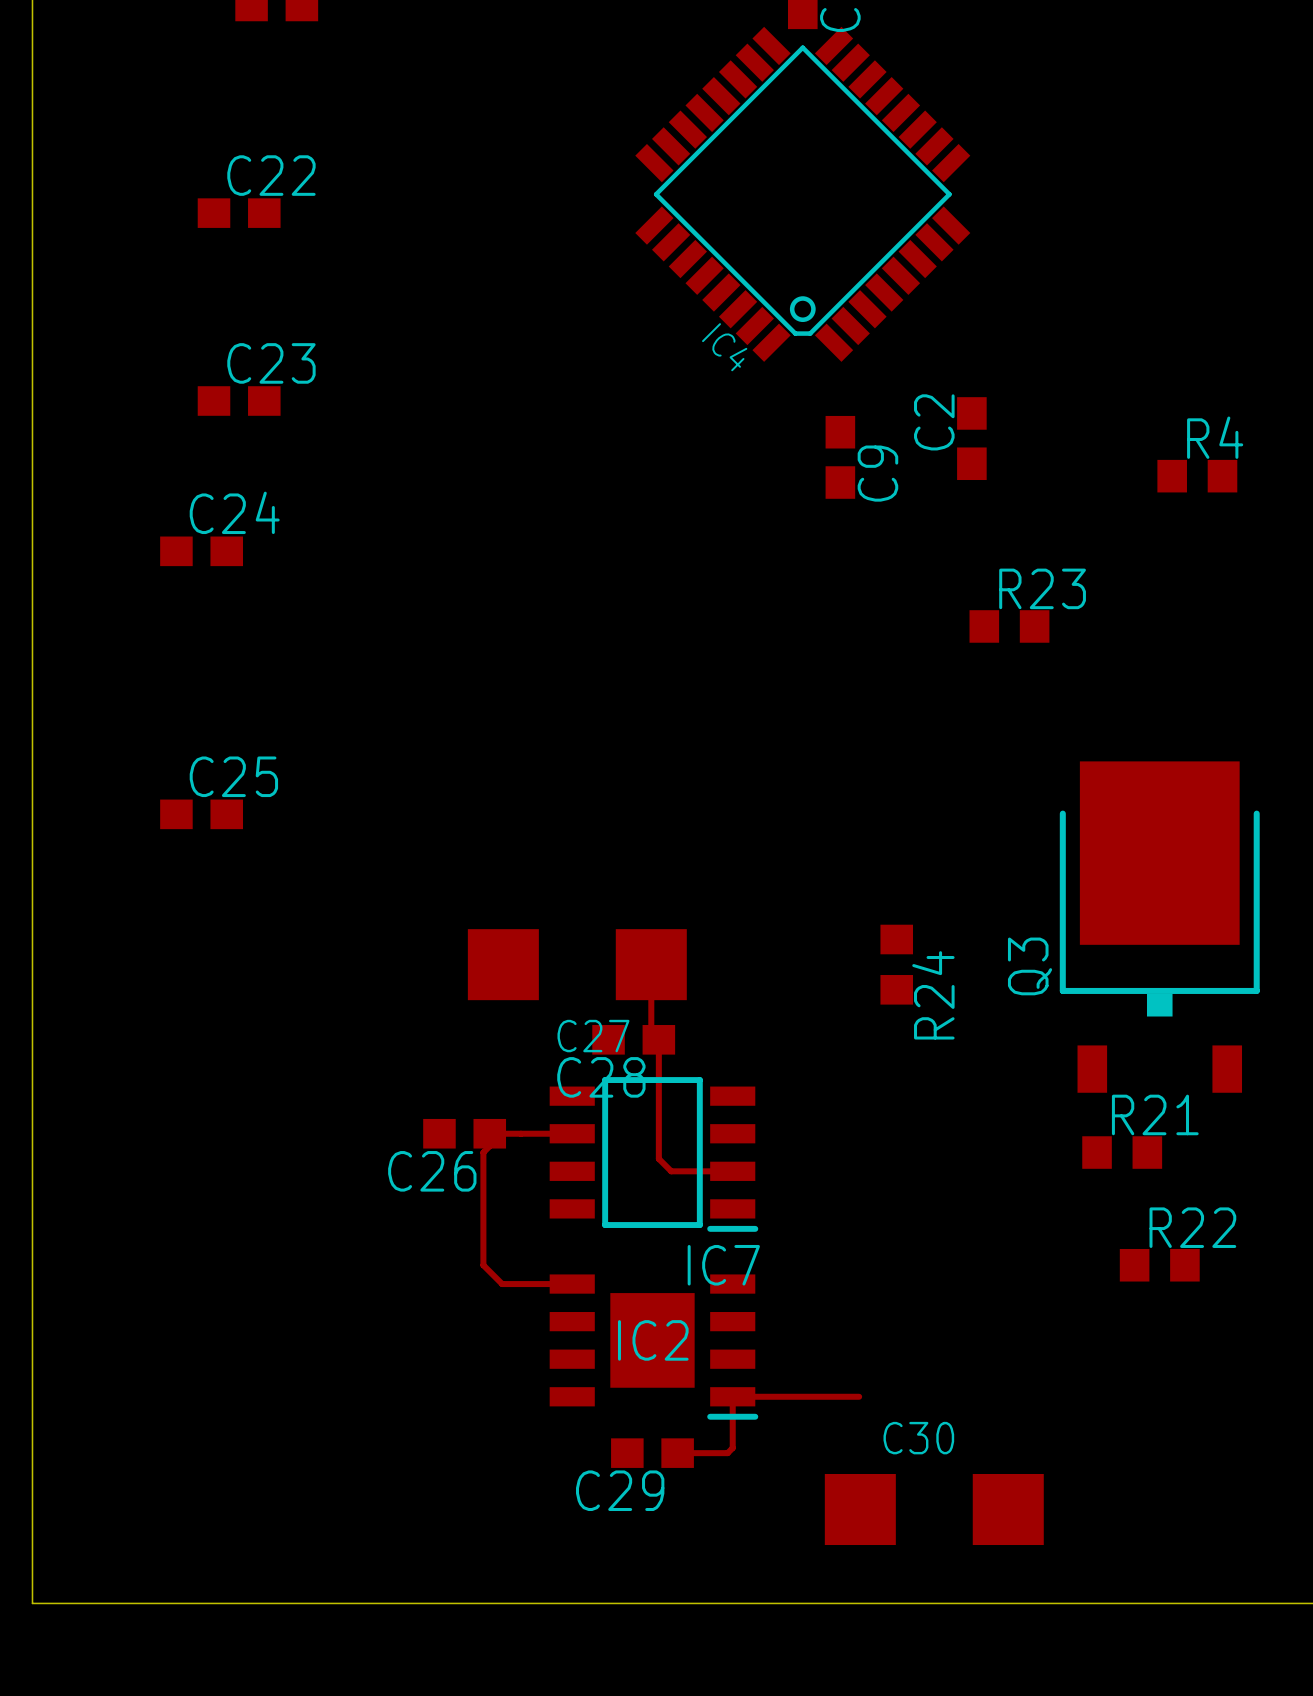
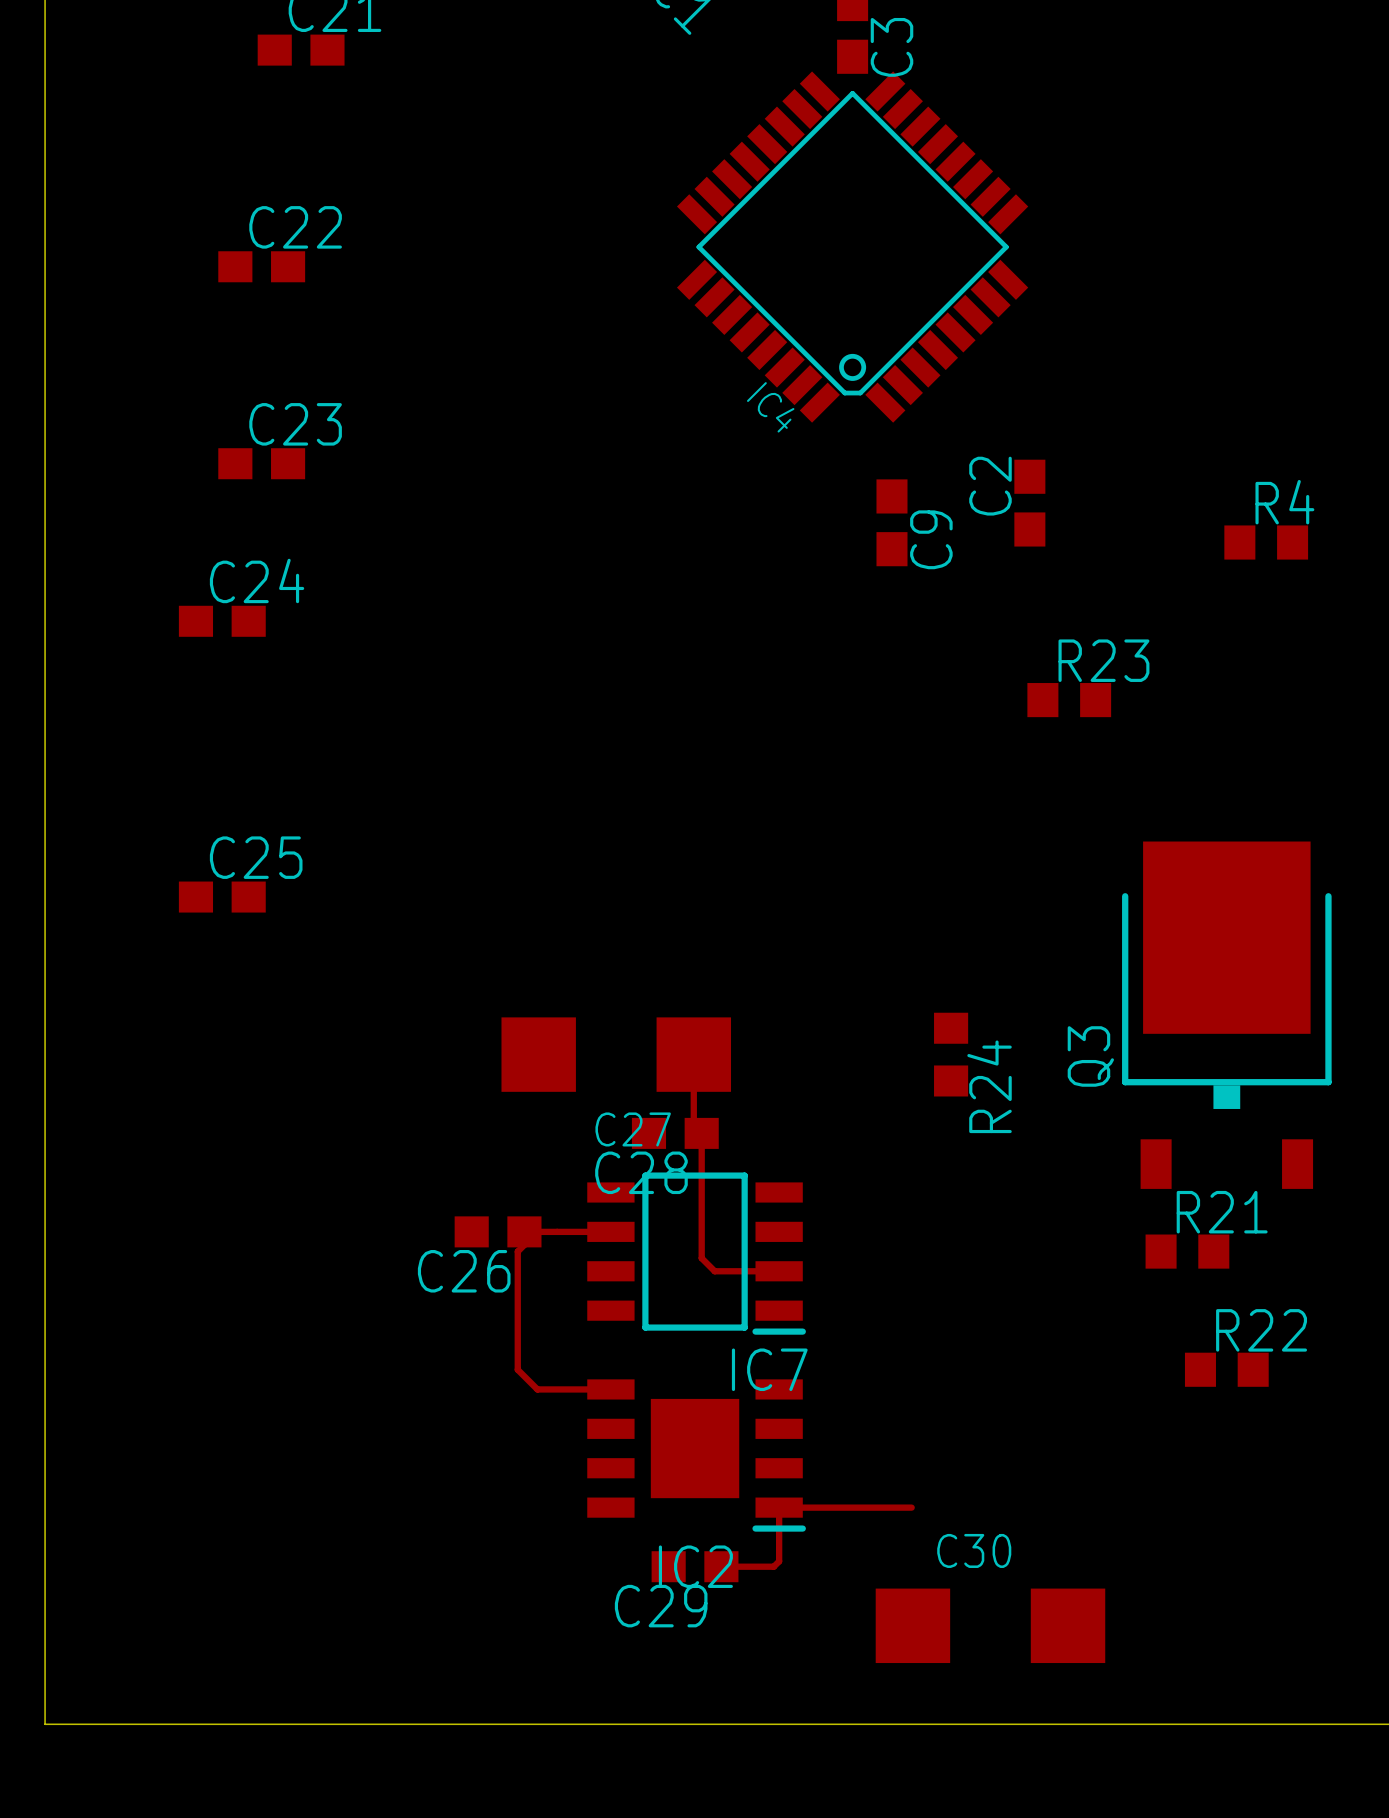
IC2 name position: IC2 (653, 1340) -> IC2 (695, 1566)

